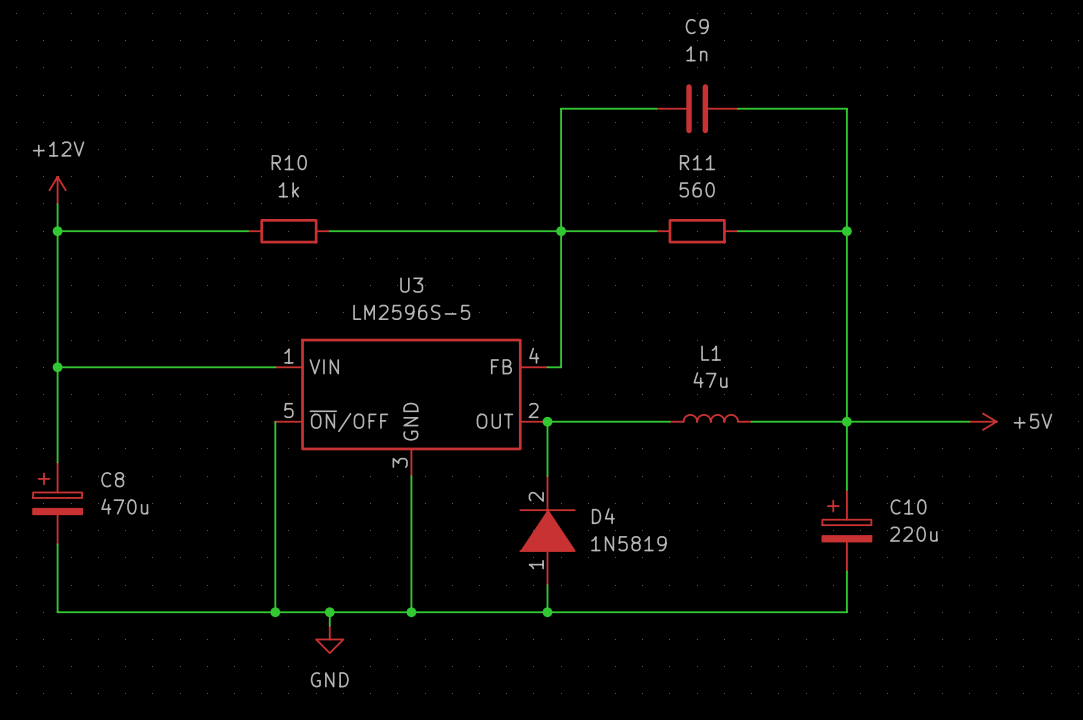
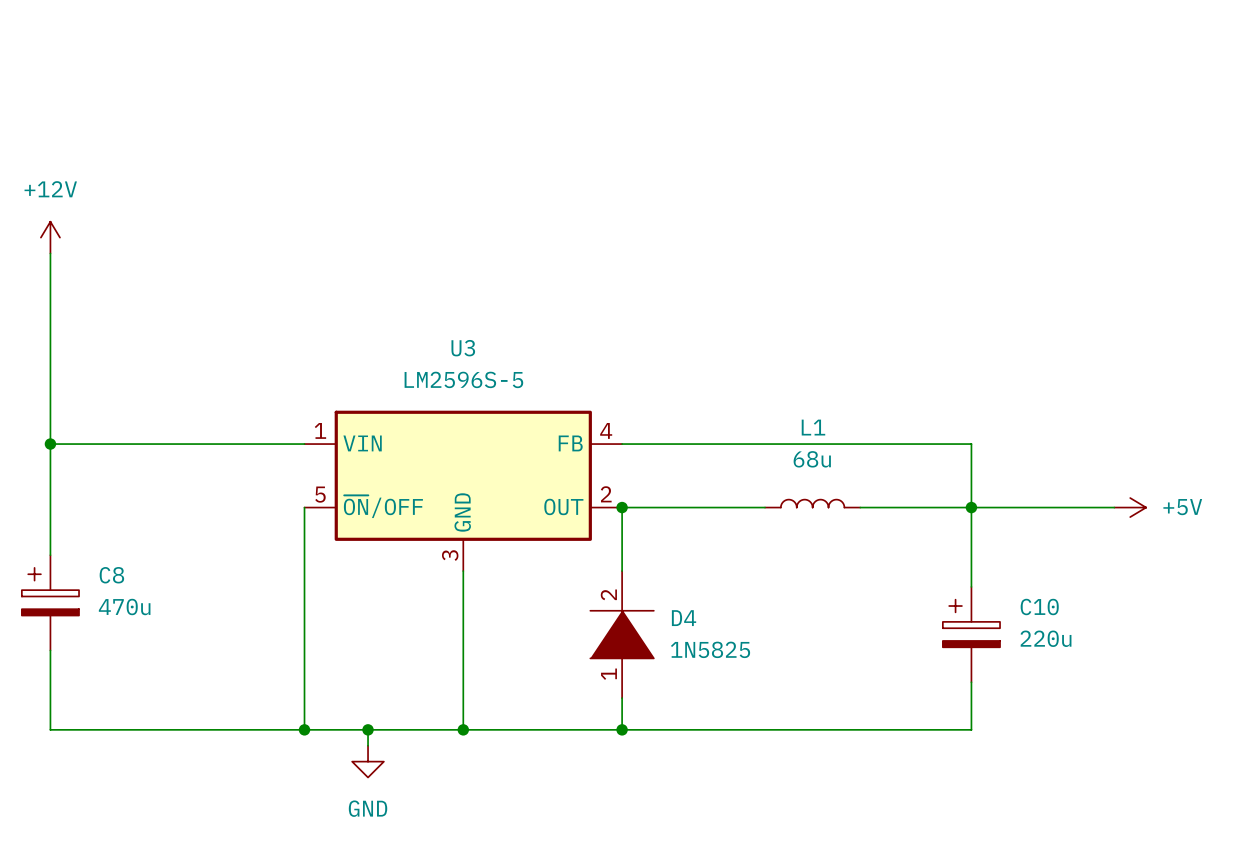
wire: (656, 108) (561, 108) (561, 367) -> none
C9: 1n (697, 108) -> none
wire: (738, 108) (846, 108) (846, 367) -> (637, 444) (971, 444)
wire: (57, 231) (248, 231) -> none
junction: (57, 231) -> none
R10: 1k (288, 231) -> none
wire: (329, 231) (656, 231) -> none
junction: (561, 231) -> none
R11: 560 (697, 231) -> none
wire: (738, 231) (846, 231) -> none
junction: (846, 231) -> none
L1 value: 47u (710, 380) -> 68u (812, 459)
D4 value: 1N5819 (628, 543) -> 1N5825 (710, 649)

